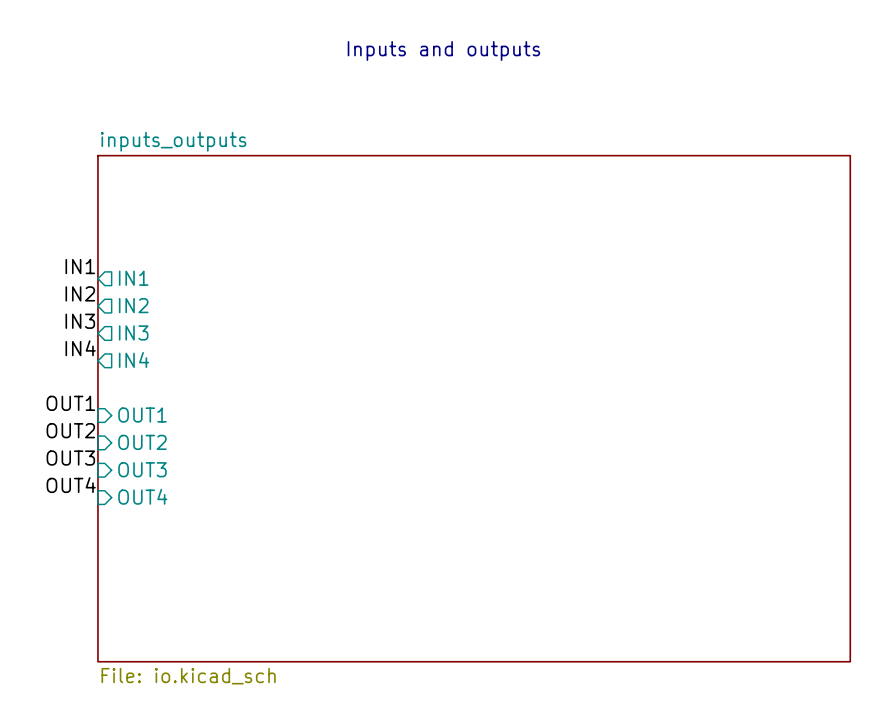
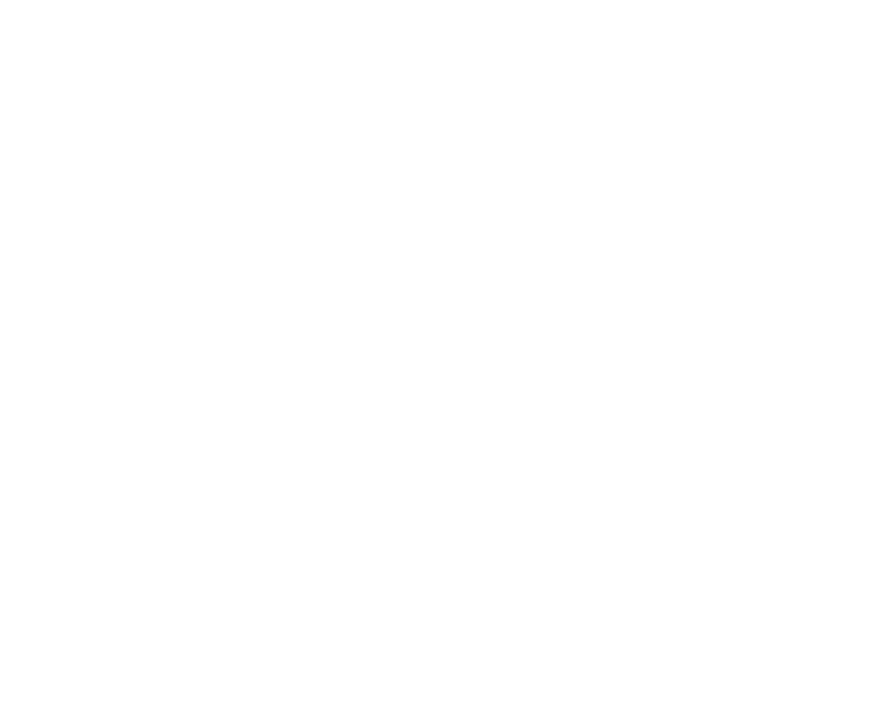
text: Inputs and outputs (443, 50) -> none
label: IN1 (80, 266) -> none
sheet pin: IN1 (133, 278) -> none
label: IN2 (80, 293) -> none
sheet pin: IN2 (133, 305) -> none
label: IN3 (80, 321) -> none
sheet pin: IN3 (133, 332) -> none
label: IN4 (80, 348) -> none
sheet pin: IN4 (134, 359) -> none
label: OUT1 (70, 403) -> none
sheet inputs_outputs: File: io.kicad_sch (474, 408) -> none
sheet pin: OUT1 (142, 415) -> none
label: OUT2 (70, 430) -> none
sheet pin: OUT2 (142, 442) -> none
label: OUT3 (70, 458) -> none
sheet pin: OUT3 (142, 469) -> none
label: OUT4 (71, 485) -> none
sheet pin: OUT4 (142, 496) -> none

